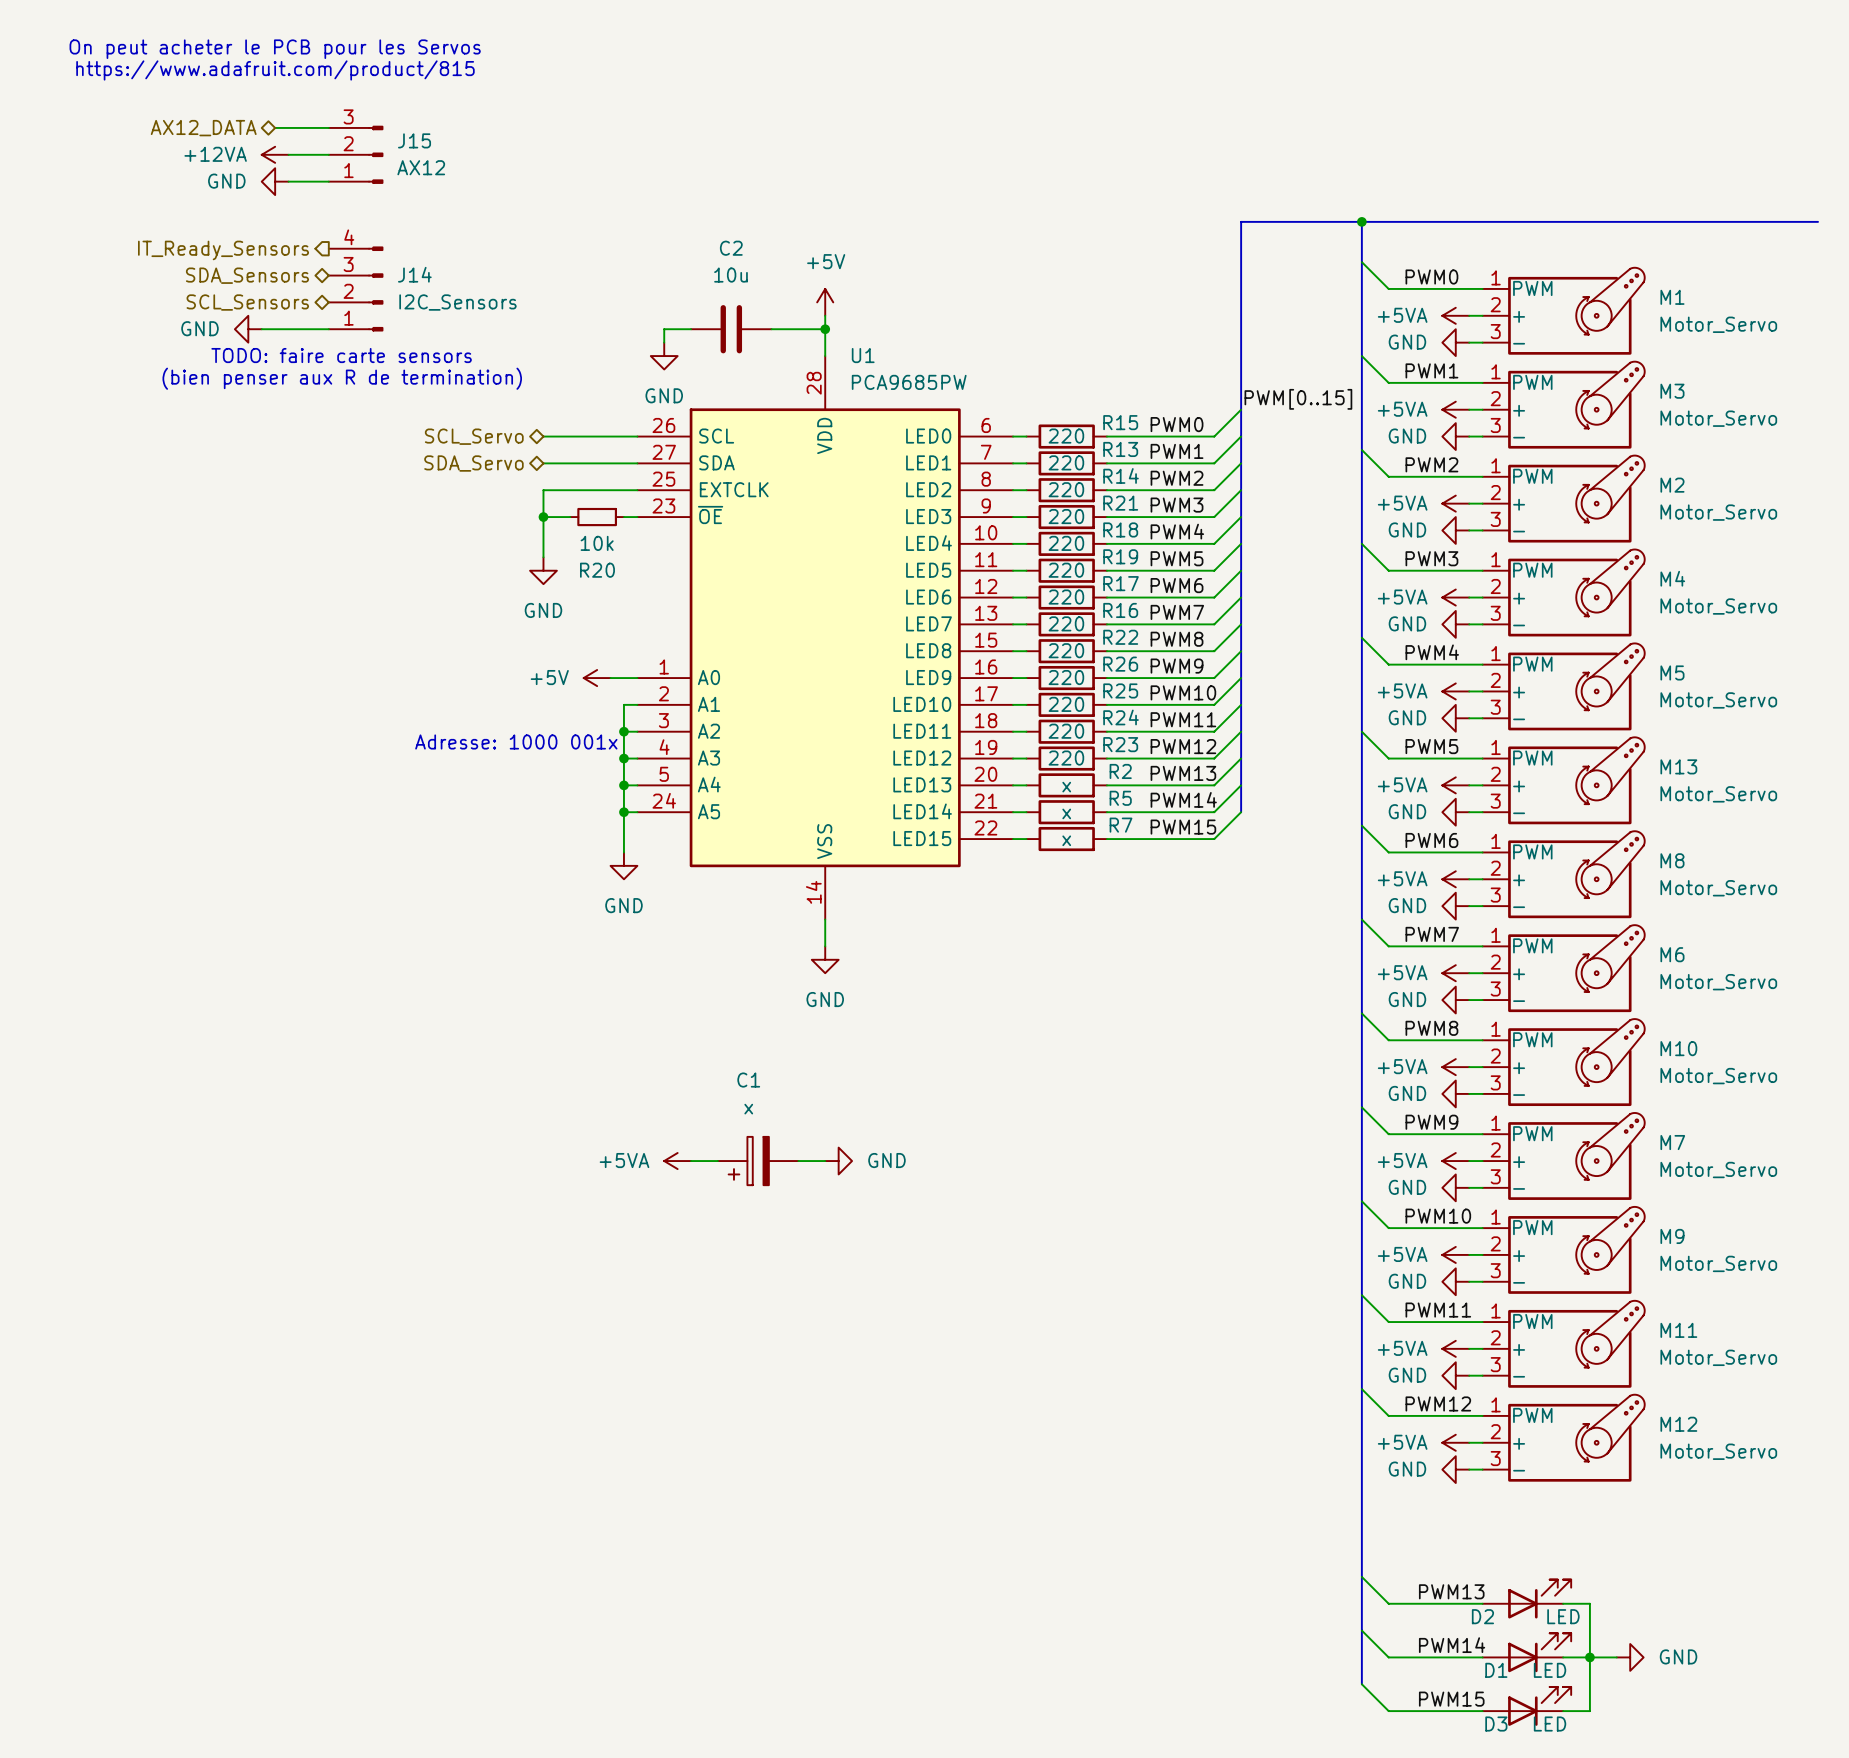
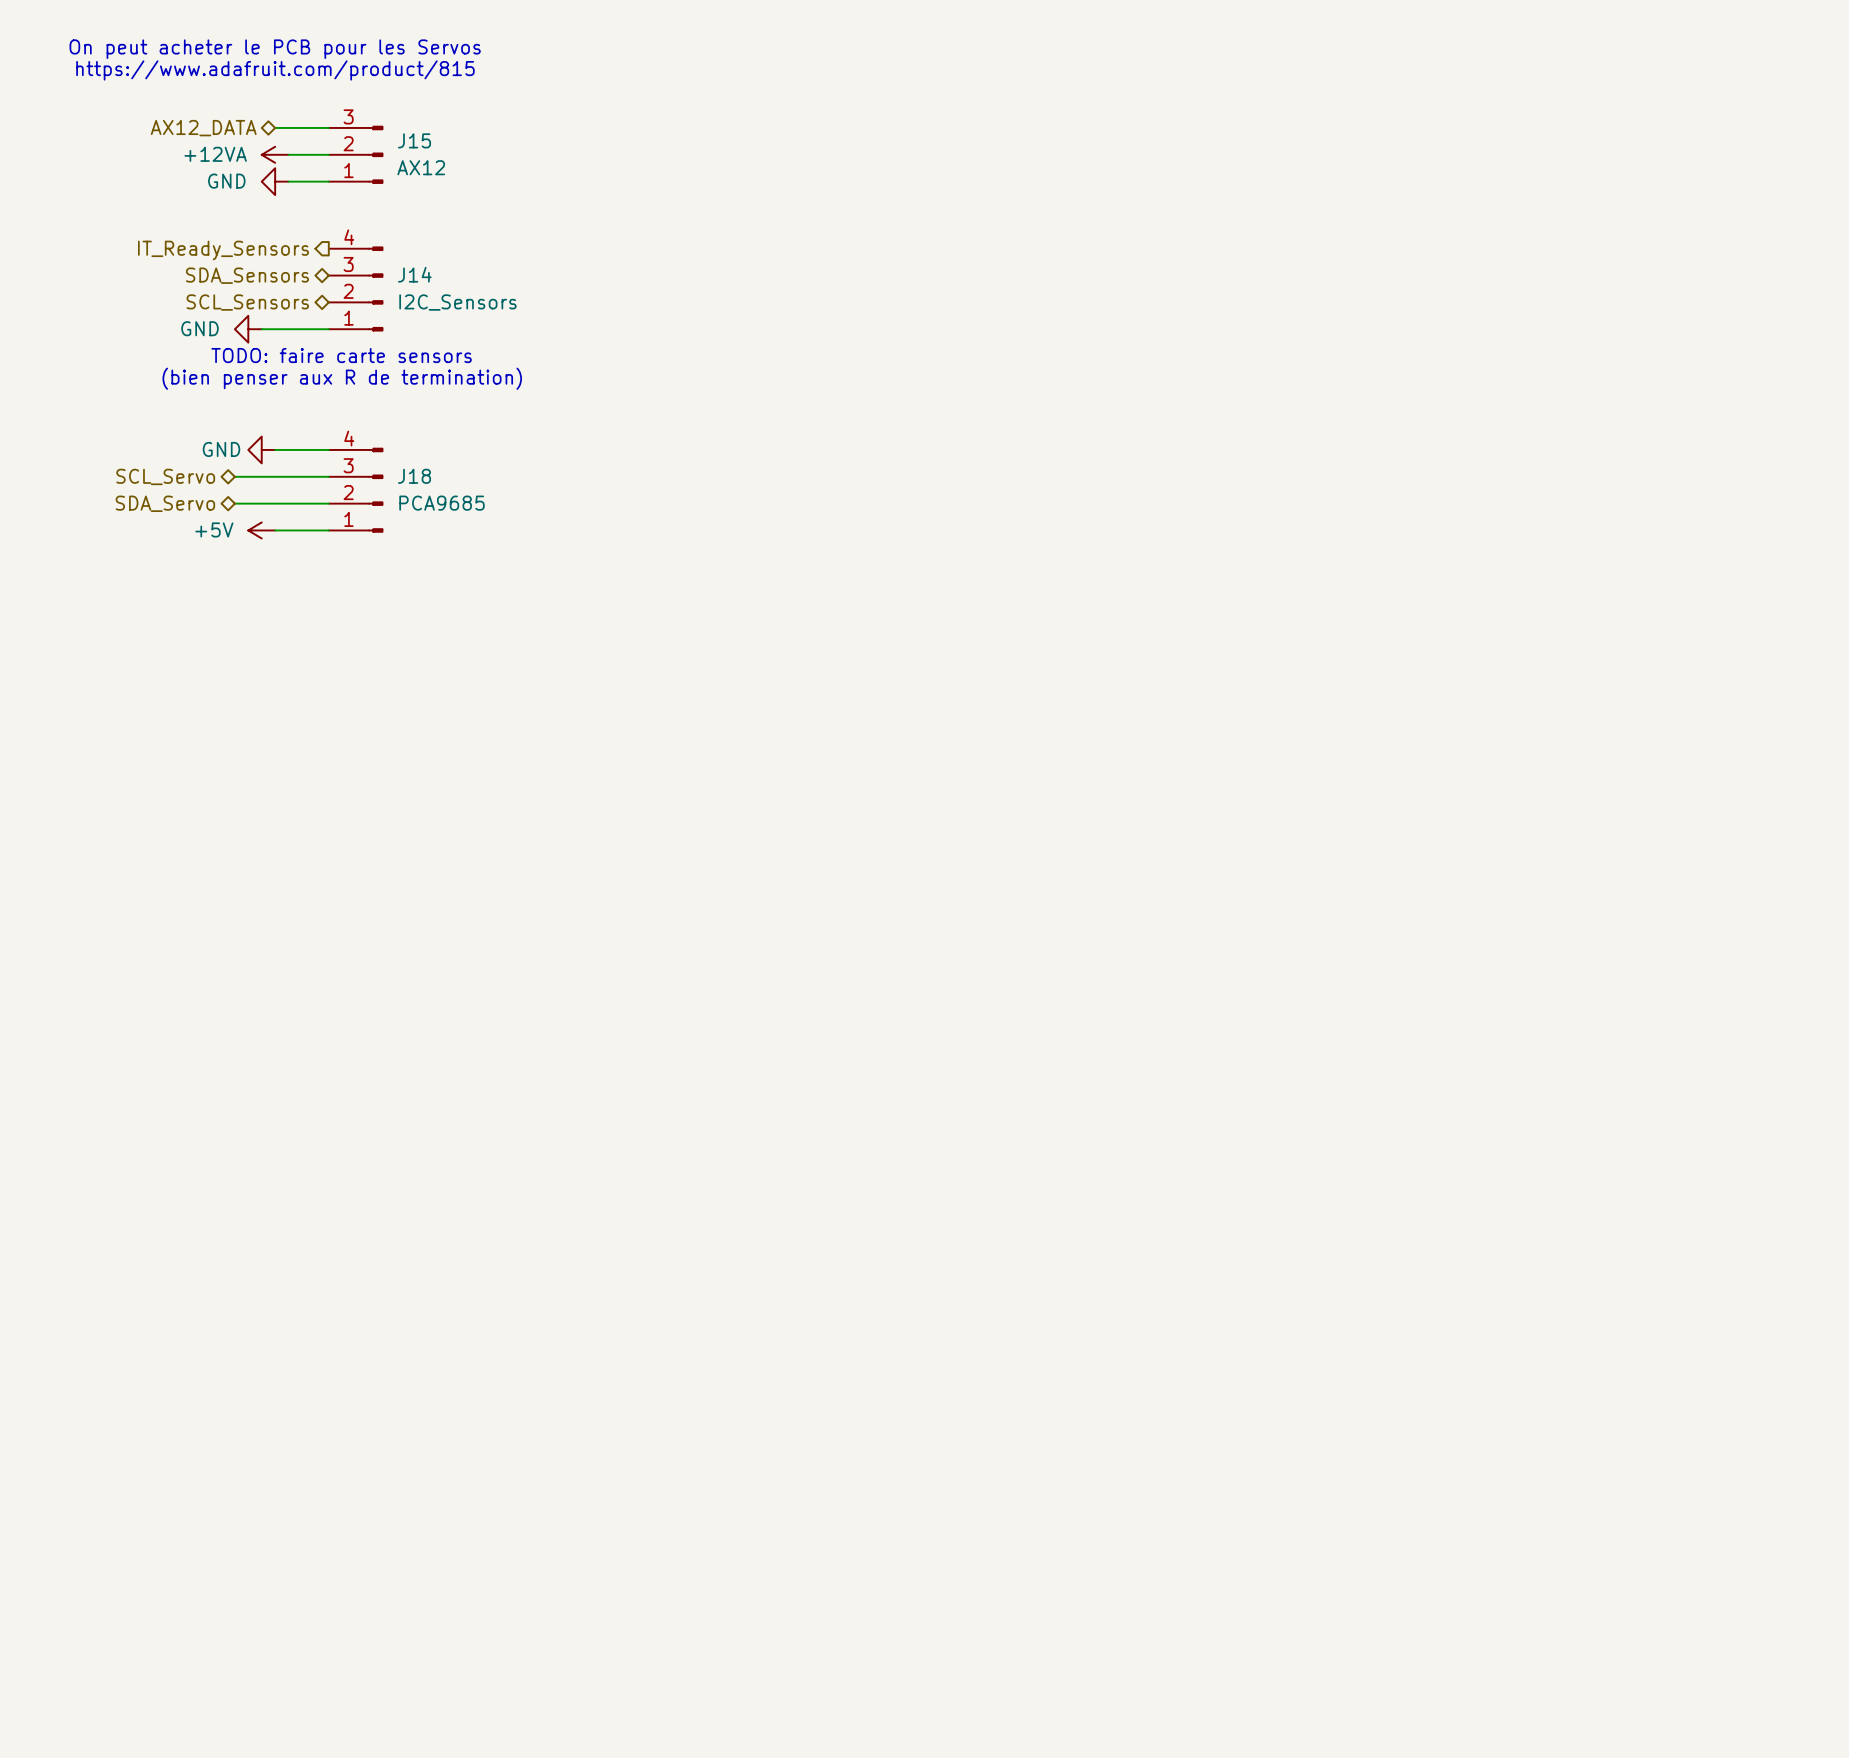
bus: (1361, 221) (1361, 1684) -> none
junction: (1361, 221) -> none
bus: (1818, 221) (1241, 221) (1241, 812) -> none
wire: (1361, 262) (1388, 288) (1482, 288) -> none
label: PWM0 (1431, 277) -> none
power symbol: +5V (825, 302) -> none
M1: Motor_Servo (1563, 311) -> none
wire: (825, 315) (825, 356) -> none
power symbol: +5VA (1455, 315) -> none
wire: (1469, 315) (1482, 315) -> none
wire: (691, 329) (664, 329) (664, 342) -> none
C2: 10u (731, 329) -> none
wire: (771, 329) (825, 329) -> none
junction: (825, 329) -> none
power symbol: GND (1455, 342) -> none
wire: (1469, 342) (1482, 342) -> none
power symbol: GND (664, 356) -> none
wire: (1361, 356) (1388, 382) (1482, 382) -> none
label: PWM1 (1431, 370) -> none
label: PWM[0..15] (1298, 399) -> none
M3: Motor_Servo (1563, 405) -> none
wire: (1241, 409) (1214, 436) (1106, 436) -> none
power symbol: +5VA (1455, 409) -> none
wire: (1469, 409) (1482, 409) -> none
label: PWM0 (1177, 424) -> none
hierarchical label: SCL_Servo (474, 436) -> none
wire: (543, 436) (637, 436) -> none
wire: (1013, 436) (1026, 436) -> none
R15: 220 (1066, 436) -> none
wire: (1241, 436) (1214, 463) (1106, 463) -> none
power symbol: GND (1455, 436) -> none
wire: (1469, 436) (1482, 436) -> none
power symbol: none -> GND (261, 449)
wire: none -> (275, 449) (328, 449)
wire: (1361, 449) (1388, 476) (1482, 476) -> none
label: PWM1 (1177, 451) -> none
hierarchical label: SDA_Servo (473, 463) -> none
wire: (543, 463) (637, 463) -> none
wire: (1013, 463) (1026, 463) -> none
R13: 220 (1066, 463) -> none
wire: (1241, 463) (1214, 490) (1106, 490) -> none
label: PWM2 (1431, 464) -> none
hierarchical label: none -> SCL_Servo (165, 476)
wire: none -> (234, 476) (328, 476)
label: PWM2 (1177, 478) -> none
J18: none -> PCA9685 (356, 490)
wire: (637, 490) (543, 490) (543, 557) -> none
wire: (1013, 490) (1026, 490) -> none
R14: 220 (1066, 490) -> none
wire: (1241, 490) (1214, 517) (1106, 517) -> none
M2: Motor_Servo (1563, 499) -> none
hierarchical label: none -> SDA_Servo (165, 503)
wire: none -> (234, 503) (328, 503)
power symbol: +5VA (1455, 503) -> none
wire: (1469, 503) (1482, 503) -> none
label: PWM3 (1177, 505) -> none
wire: (543, 517) (570, 517) -> none
junction: (543, 517) -> none
R20: 10k (597, 517) -> none
wire: (623, 517) (637, 517) -> none
wire: (1013, 517) (1026, 517) -> none
R21: 220 (1066, 517) -> none
wire: (1241, 517) (1214, 543) (1106, 543) -> none
power symbol: none -> +5V (261, 530)
wire: none -> (275, 530) (328, 530)
power symbol: GND (1455, 530) -> none
wire: (1469, 530) (1482, 530) -> none
label: PWM4 (1177, 531) -> none
wire: (1013, 543) (1026, 543) -> none
R18: 220 (1066, 543) -> none
wire: (1241, 543) (1214, 570) (1106, 570) -> none
wire: (1361, 543) (1388, 570) (1482, 570) -> none
label: PWM5 (1177, 558) -> none
label: PWM3 (1431, 558) -> none
power symbol: GND (543, 570) -> none
wire: (1013, 570) (1026, 570) -> none
R19: 220 (1066, 570) -> none
wire: (1241, 570) (1214, 597) (1106, 597) -> none
label: PWM6 (1177, 585) -> none
M4: Motor_Servo (1563, 592) -> none
wire: (1013, 597) (1026, 597) -> none
R17: 220 (1066, 597) -> none
wire: (1241, 597) (1214, 624) (1106, 624) -> none
power symbol: +5VA (1455, 597) -> none
wire: (1469, 597) (1482, 597) -> none
label: PWM7 (1177, 612) -> none
wire: (1013, 624) (1026, 624) -> none
R16: 220 (1066, 624) -> none
wire: (1241, 624) (1214, 651) (1106, 651) -> none
power symbol: GND (1455, 624) -> none
wire: (1469, 624) (1482, 624) -> none
U1: PCA9685PW (825, 637) -> none
wire: (1361, 637) (1388, 664) (1482, 664) -> none
label: PWM8 (1177, 639) -> none
wire: (1013, 651) (1026, 651) -> none
R22: 220 (1066, 651) -> none
wire: (1241, 651) (1214, 678) (1106, 678) -> none
label: PWM4 (1432, 652) -> none
label: PWM9 (1177, 666) -> none
power symbol: +5V (597, 678) -> none
wire: (610, 678) (637, 678) -> none
wire: (1013, 678) (1026, 678) -> none
R26: 220 (1066, 678) -> none
wire: (1241, 678) (1214, 704) (1106, 704) -> none
M5: Motor_Servo (1563, 686) -> none
power symbol: +5VA (1455, 691) -> none
wire: (1469, 691) (1482, 691) -> none
label: PWM10 (1183, 692) -> none
wire: (637, 704) (623, 704) (623, 852) -> none
wire: (1013, 704) (1026, 704) -> none
R25: 220 (1066, 704) -> none
wire: (1241, 704) (1214, 731) (1106, 731) -> none
power symbol: GND (1455, 718) -> none
wire: (1469, 718) (1482, 718) -> none
label: PWM11 (1183, 719) -> none
wire: (623, 731) (637, 731) -> none
junction: (623, 731) -> none
wire: (1013, 731) (1026, 731) -> none
R24: 220 (1066, 731) -> none
wire: (1241, 731) (1214, 758) (1106, 758) -> none
wire: (1361, 731) (1388, 758) (1482, 758) -> none
text: Adresse: 1000 001x (516, 741) -> none
label: PWM12 (1183, 746) -> none
label: PWM5 (1431, 746) -> none
wire: (623, 758) (637, 758) -> none
junction: (623, 758) -> none
wire: (1013, 758) (1026, 758) -> none
R23: 220 (1066, 758) -> none
wire: (1241, 758) (1214, 785) (1106, 785) -> none
label: PWM13 (1183, 773) -> none
M13: Motor_Servo (1563, 780) -> none
wire: (623, 785) (637, 785) -> none
junction: (623, 785) -> none
wire: (1013, 785) (1026, 785) -> none
R2: x (1066, 785) -> none
wire: (1241, 785) (1214, 812) (1106, 812) -> none
power symbol: +5VA (1455, 785) -> none
wire: (1469, 785) (1482, 785) -> none
label: PWM14 (1183, 799) -> none
wire: (623, 812) (637, 812) -> none
junction: (623, 812) -> none
wire: (1013, 812) (1026, 812) -> none
R5: x (1066, 812) -> none
wire: (1241, 812) (1214, 839) (1106, 839) -> none
power symbol: GND (1455, 812) -> none
wire: (1469, 812) (1482, 812) -> none
wire: (1361, 825) (1388, 852) (1482, 852) -> none
label: PWM15 (1183, 827) -> none
wire: (1013, 839) (1026, 839) -> none
R7: x (1066, 839) -> none
label: PWM6 (1431, 840) -> none
power symbol: GND (623, 865) -> none
M8: Motor_Servo (1563, 874) -> none
power symbol: +5VA (1455, 879) -> none
wire: (1469, 879) (1482, 879) -> none
power symbol: GND (1455, 906) -> none
wire: (1469, 906) (1482, 906) -> none
wire: (825, 919) (825, 946) -> none
wire: (1361, 919) (1388, 946) (1482, 946) -> none
label: PWM7 (1432, 934) -> none
power symbol: GND (825, 959) -> none
M6: Motor_Servo (1563, 968) -> none
power symbol: +5VA (1455, 973) -> none
wire: (1469, 973) (1482, 973) -> none
power symbol: GND (1455, 1000) -> none
wire: (1469, 1000) (1482, 1000) -> none
wire: (1361, 1013) (1388, 1040) (1482, 1040) -> none
label: PWM8 (1431, 1028) -> none
M10: Motor_Servo (1563, 1062) -> none
power symbol: +5VA (1455, 1067) -> none
wire: (1469, 1067) (1482, 1067) -> none
power symbol: GND (1455, 1093) -> none
wire: (1469, 1093) (1482, 1093) -> none
wire: (1361, 1107) (1388, 1134) (1482, 1134) -> none
label: PWM9 (1431, 1122) -> none
M7: Motor_Servo (1563, 1156) -> none
power symbol: +5VA (677, 1161) -> none
wire: (691, 1161) (717, 1161) -> none
C1: x (758, 1161) -> none
wire: (798, 1161) (825, 1161) -> none
power symbol: GND (838, 1161) -> none
power symbol: +5VA (1455, 1161) -> none
wire: (1469, 1161) (1482, 1161) -> none
power symbol: GND (1455, 1187) -> none
wire: (1469, 1187) (1482, 1187) -> none
wire: (1361, 1201) (1388, 1228) (1482, 1228) -> none
label: PWM10 (1438, 1216) -> none
M9: Motor_Servo (1563, 1250) -> none
power symbol: +5VA (1455, 1254) -> none
wire: (1469, 1254) (1482, 1254) -> none
power symbol: GND (1455, 1281) -> none
wire: (1469, 1281) (1482, 1281) -> none
wire: (1361, 1295) (1388, 1322) (1482, 1322) -> none
label: PWM11 (1438, 1310) -> none
M11: Motor_Servo (1563, 1344) -> none
power symbol: +5VA (1455, 1348) -> none
wire: (1469, 1348) (1482, 1348) -> none
power symbol: GND (1455, 1375) -> none
wire: (1469, 1375) (1482, 1375) -> none
wire: (1361, 1389) (1388, 1415) (1482, 1415) -> none
label: PWM12 (1438, 1403) -> none
M12: Motor_Servo (1563, 1438) -> none
power symbol: +5VA (1455, 1442) -> none
wire: (1469, 1442) (1482, 1442) -> none
power symbol: GND (1455, 1469) -> none
wire: (1469, 1469) (1482, 1469) -> none
wire: (1361, 1576) (1388, 1603) (1482, 1603) -> none
label: PWM13 (1451, 1591) -> none
D2: LED (1526, 1599) -> none
wire: (1563, 1603) (1589, 1603) (1589, 1711) (1563, 1711) -> none
wire: (1361, 1630) (1388, 1657) (1482, 1657) -> none
label: PWM14 (1452, 1645) -> none
D1: LED (1526, 1652) -> none
wire: (1563, 1657) (1616, 1657) -> none
junction: (1589, 1657) -> none
power symbol: GND (1630, 1657) -> none
wire: (1361, 1684) (1388, 1711) (1482, 1711) -> none
label: PWM15 (1451, 1699) -> none
D3: LED (1526, 1706) -> none

